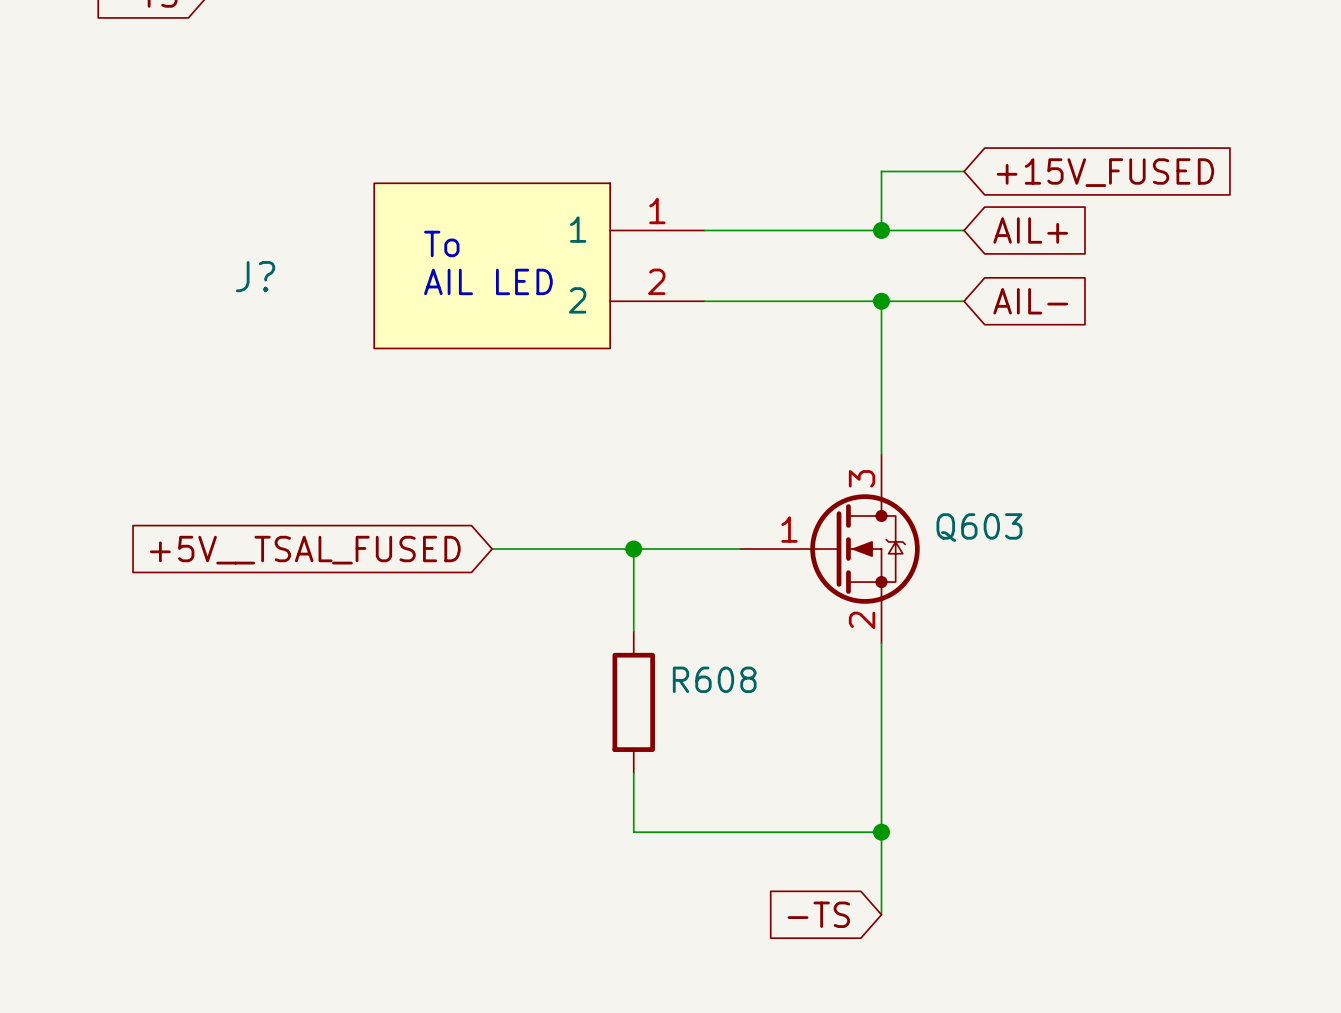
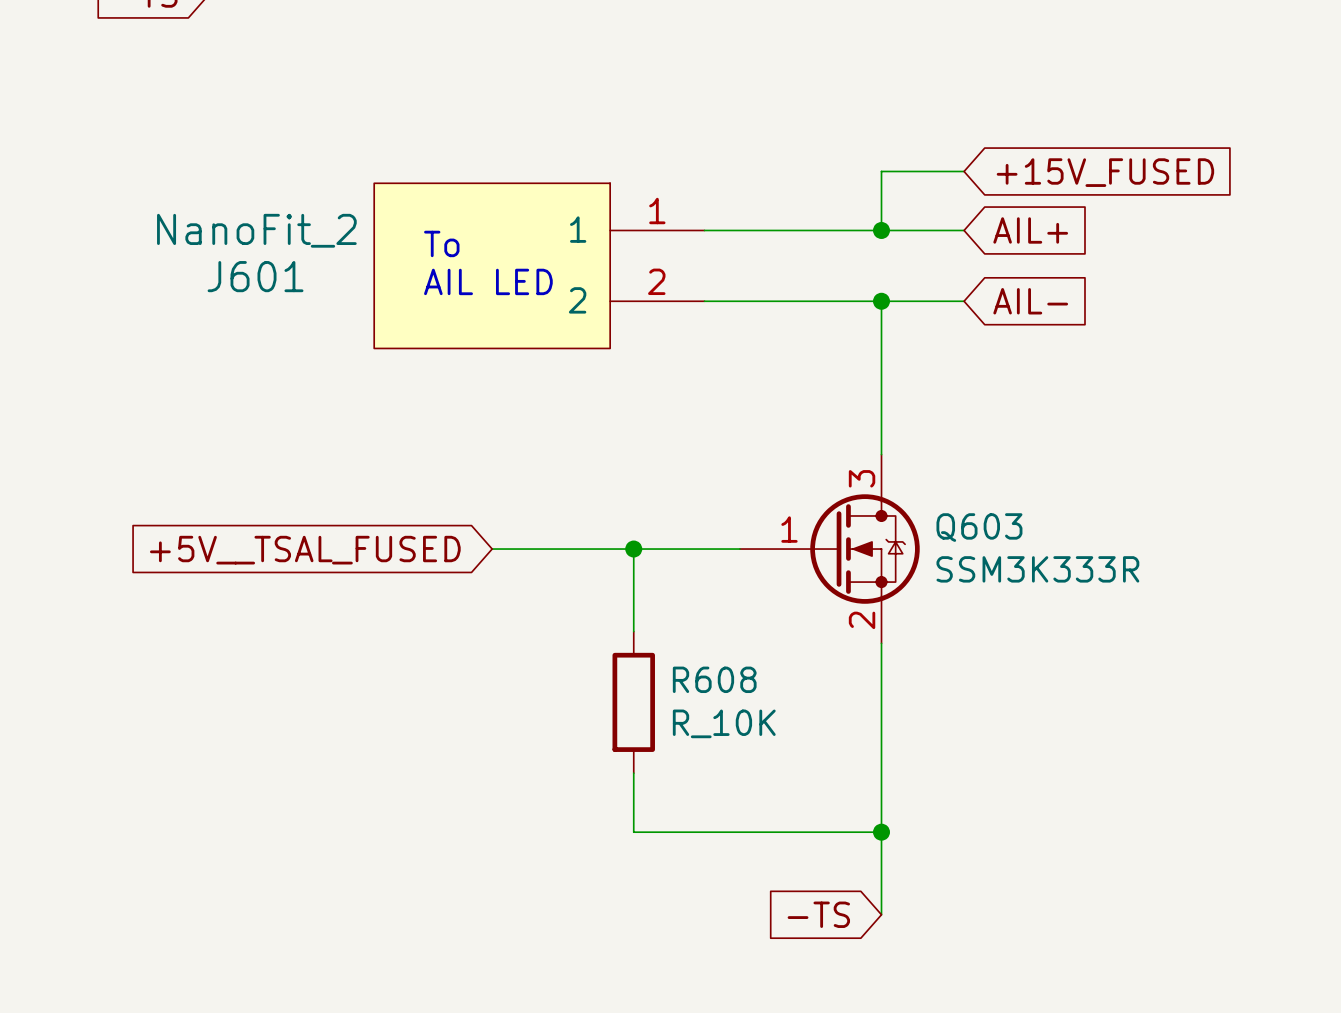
J? value: none -> NanoFit_2 (256, 230)
J? name: J? (255, 276) -> J601 (255, 276)
Q603 value: none -> SSM3K333R (1037, 569)
R608 value: none -> R_10K (724, 723)

